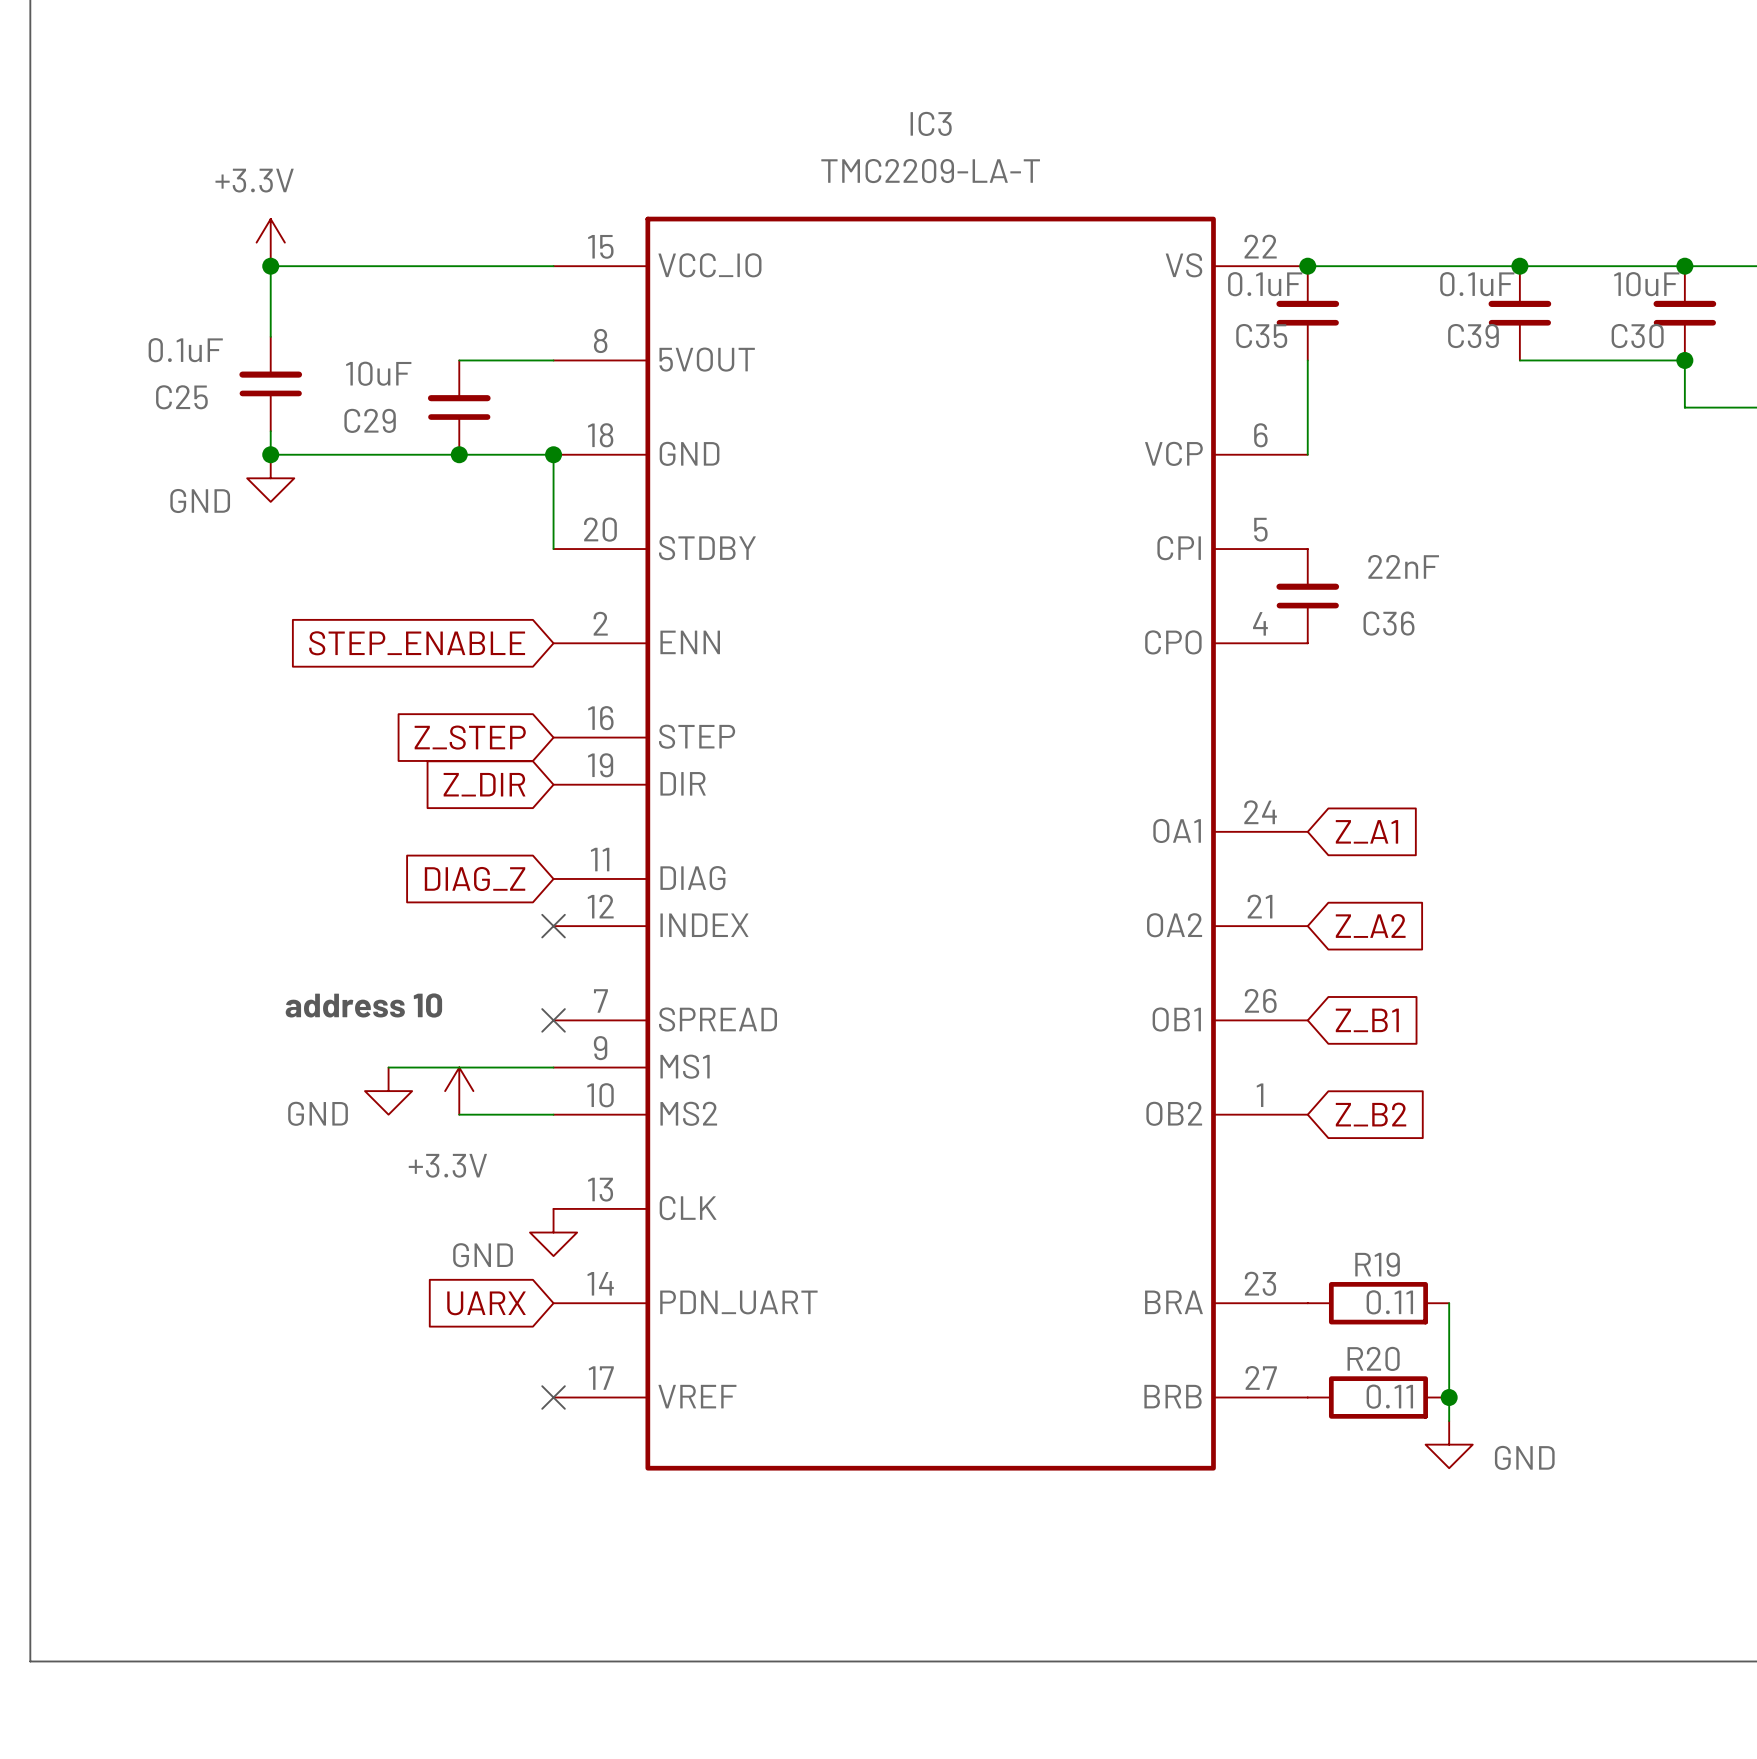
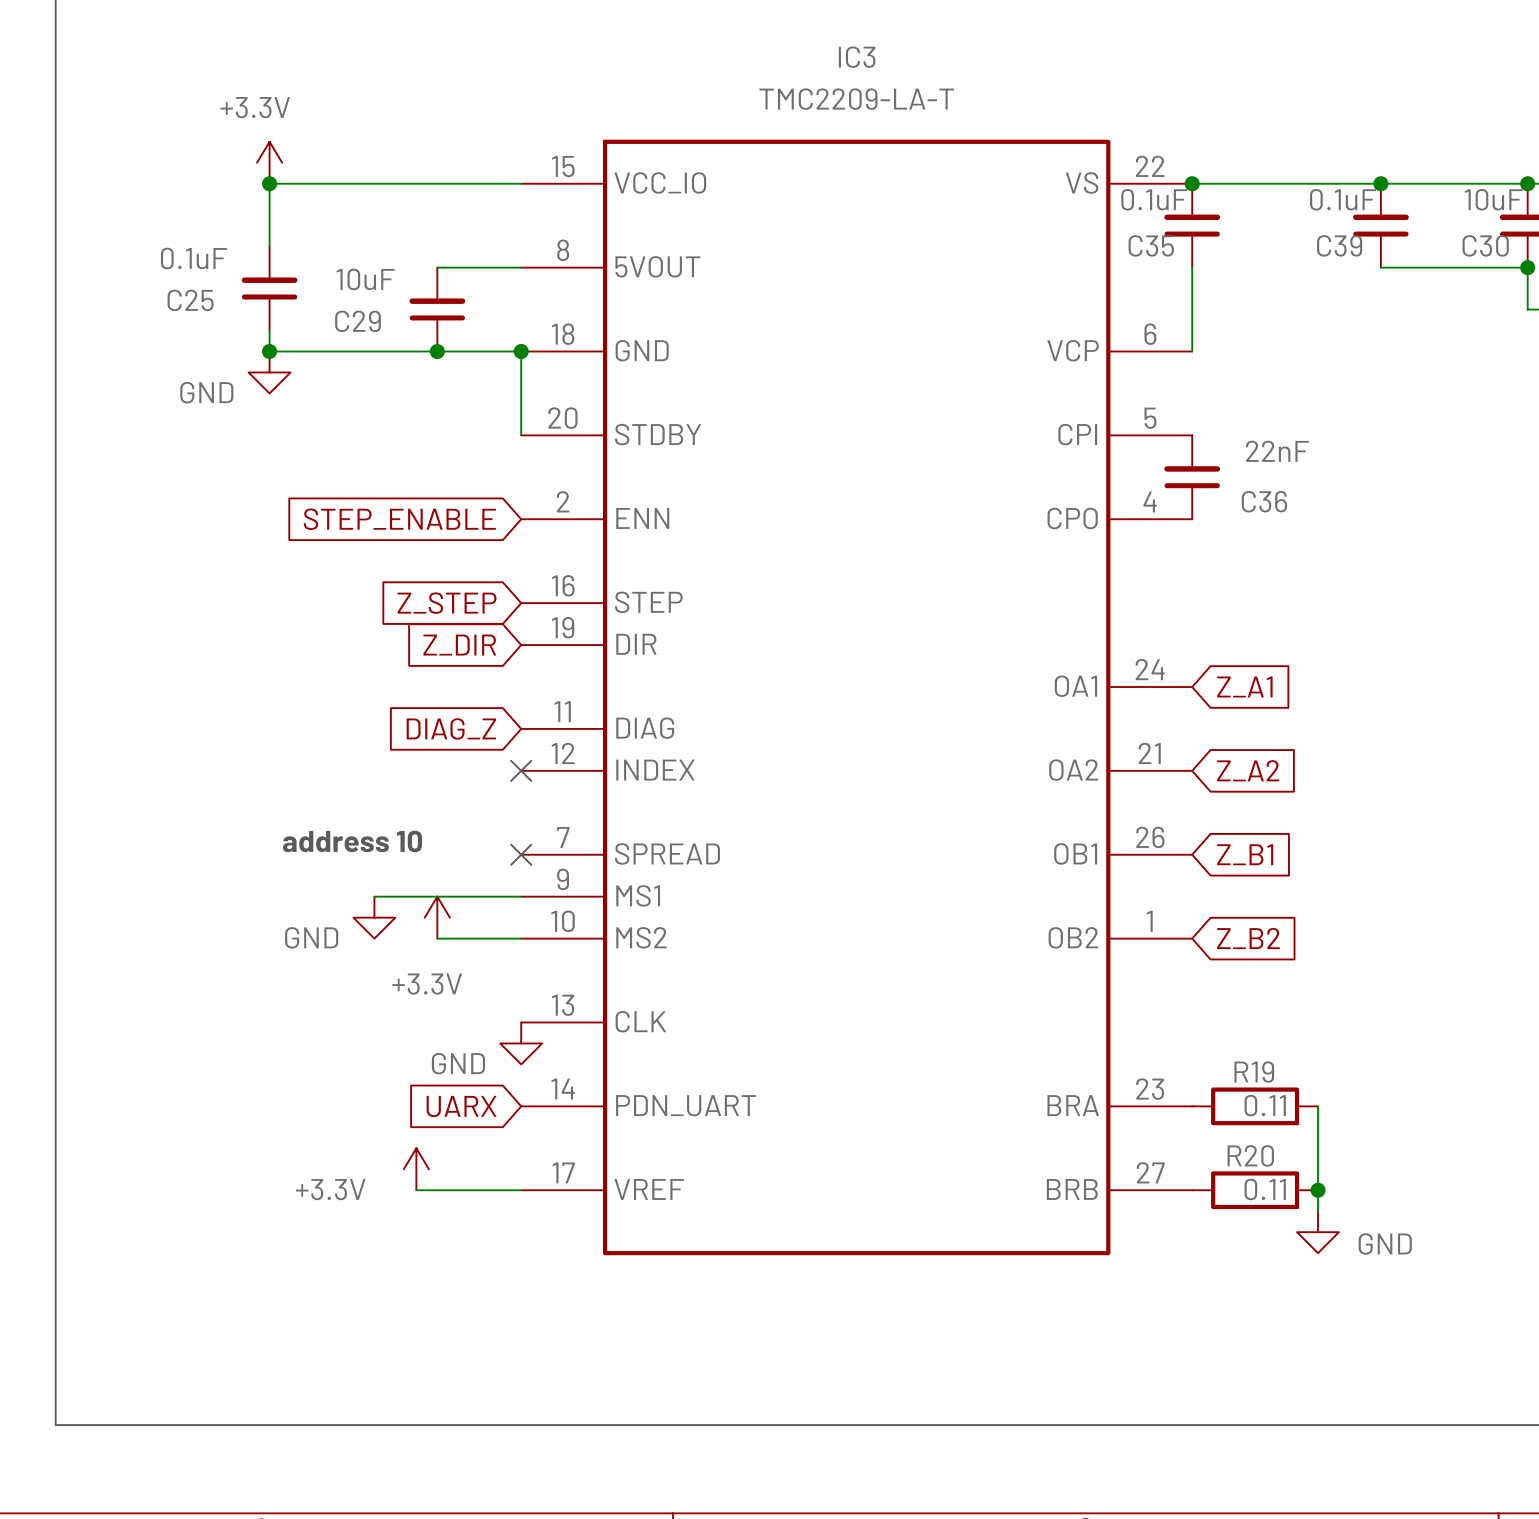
power symbol: none -> +3.3V (416, 1169)
wire: none -> (416, 1190) (521, 1190)
no-connect mark: (553, 1397) -> none

